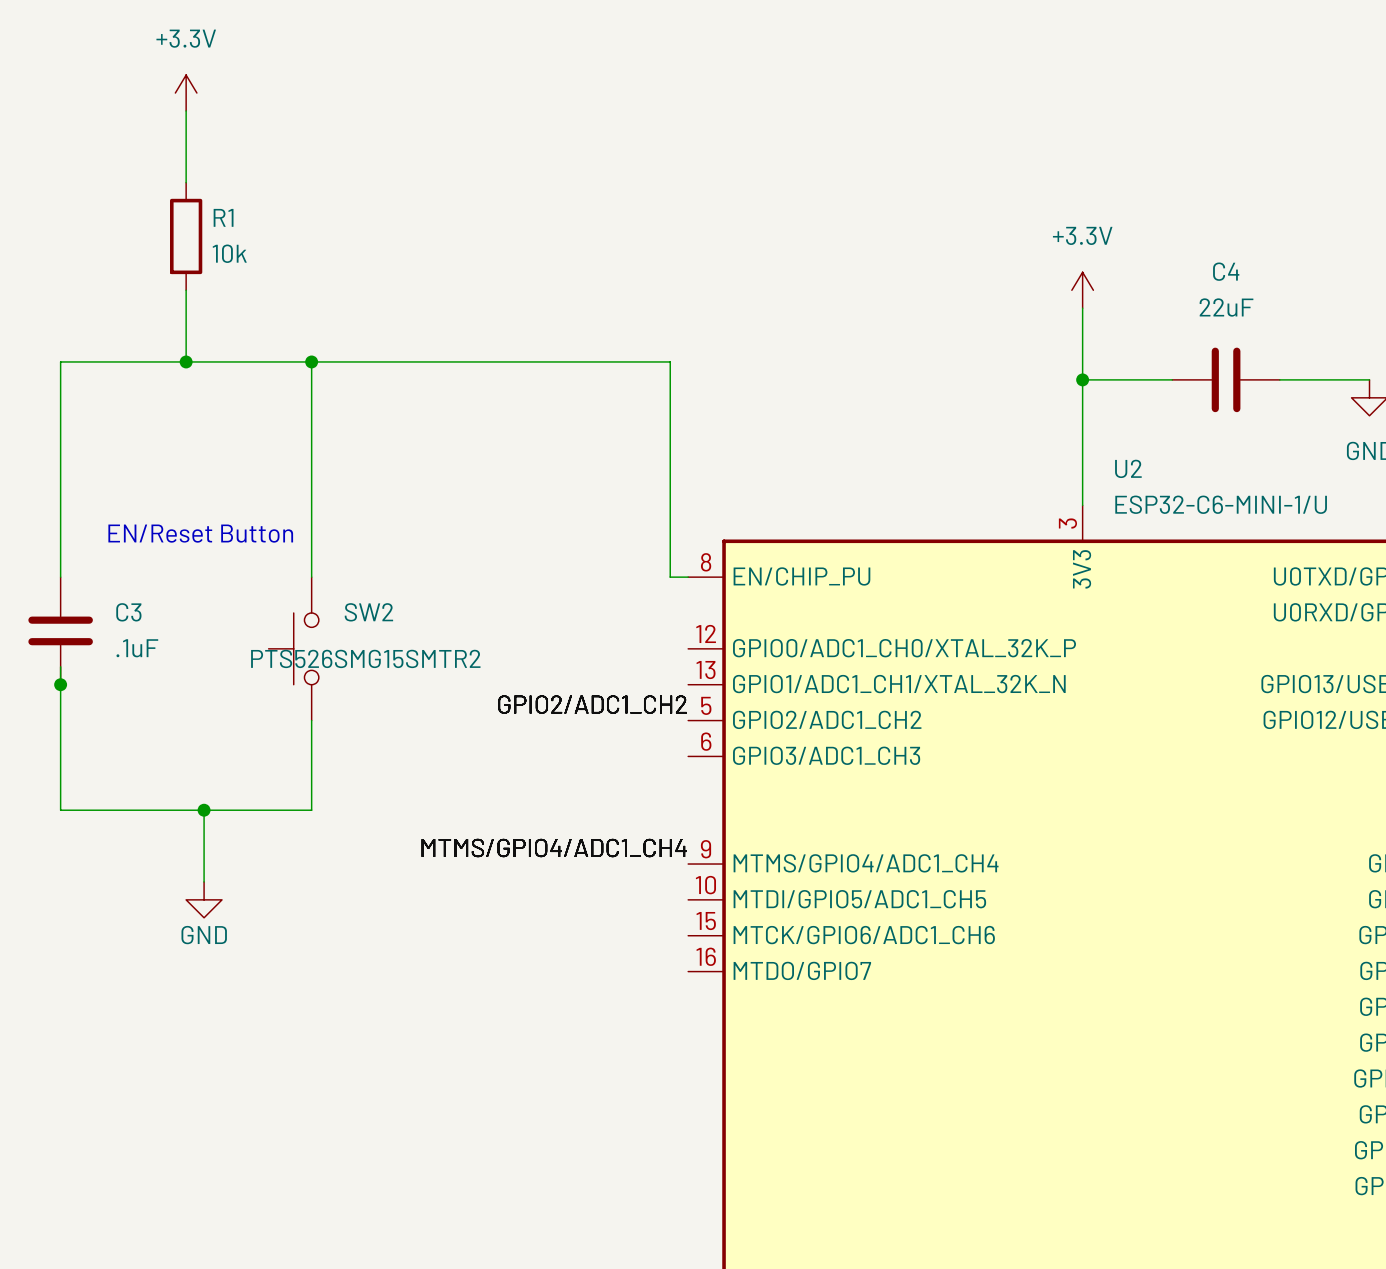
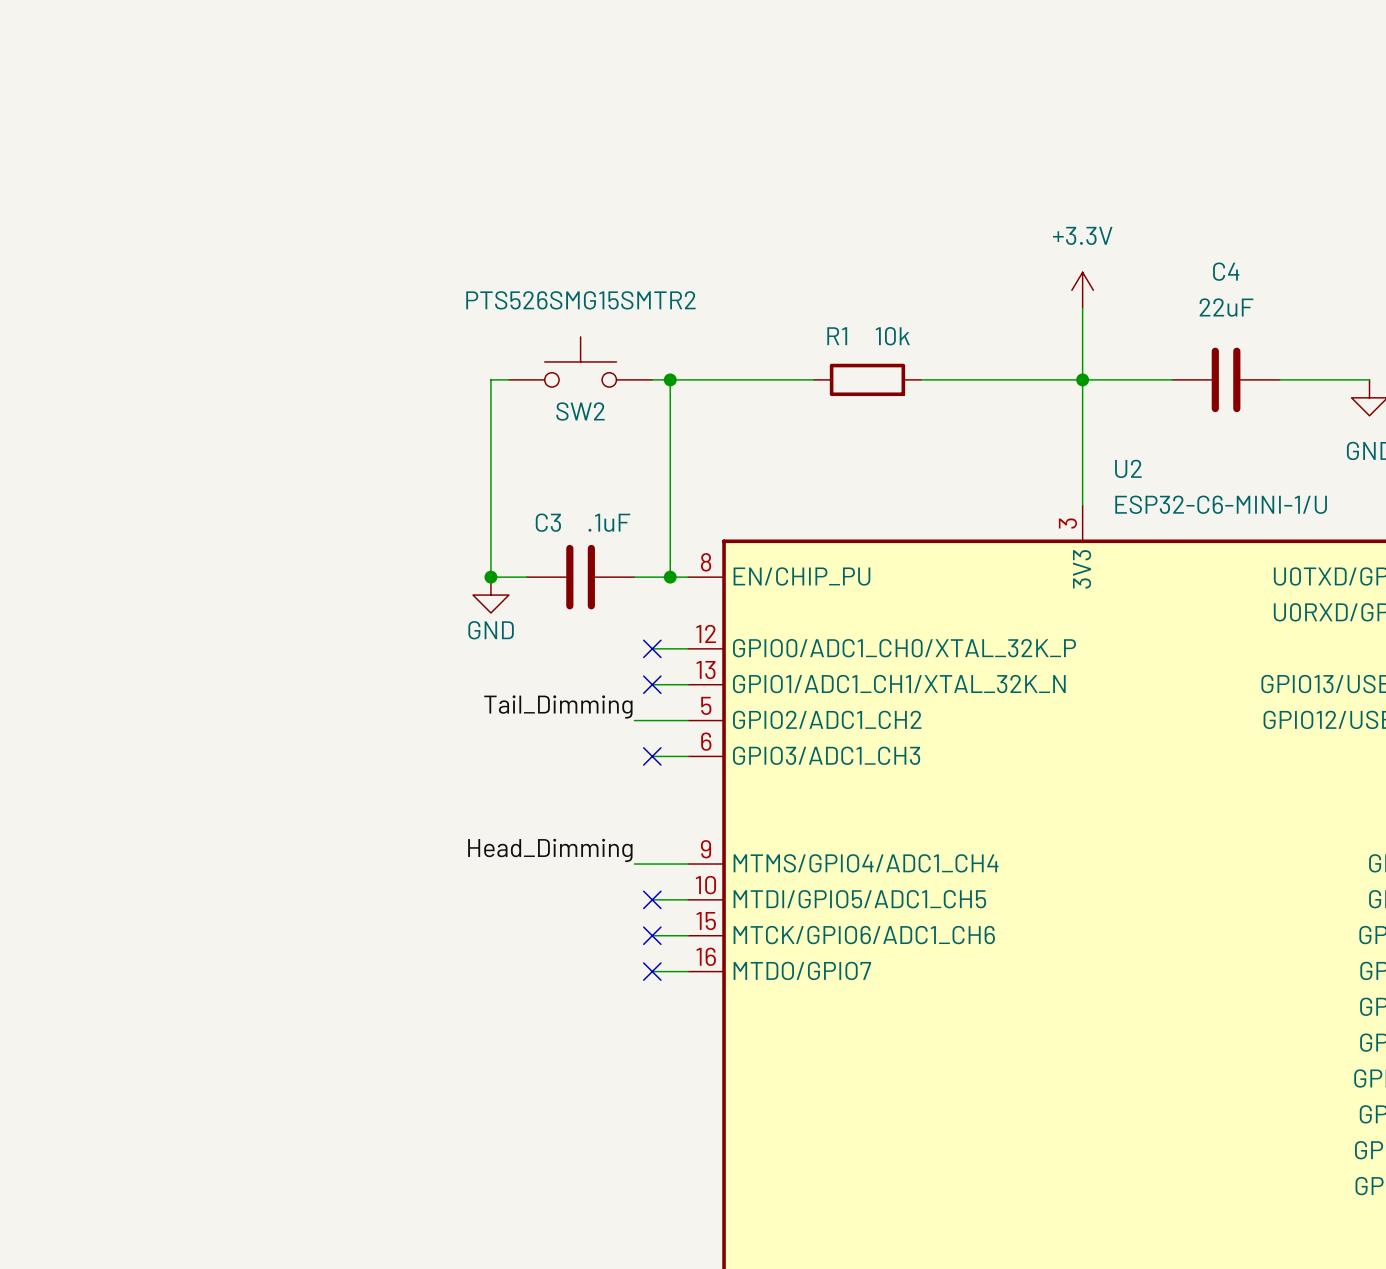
power symbol: +3.3V (186, 93) -> none
wire: (186, 110) (186, 182) -> none
R1 name position: R1 (223, 217) -> R1 (837, 336)
R1 rotation: 0° (186, 236) -> 90° clockwise (867, 379)
R1 position: (186, 236) -> (867, 379)
R1 value position: 10k (229, 253) -> 10k (892, 336)
wire: (186, 290) (186, 361) -> none
junction: (186, 361) -> none
wire: (311, 361) (311, 577) -> none
junction: (311, 361) -> none
wire: none -> (508, 379) (490, 379) (490, 577) (526, 577)
wire: none -> (652, 379) (813, 379)
wire: (670, 379) (670, 361) (60, 361) (60, 577) -> none
junction: none -> (670, 379)
wire: none -> (921, 379) (1082, 379)
text: EN/Reset Button (200, 533) -> none
junction: none -> (490, 577)
wire: none -> (634, 577) (670, 577)
junction: none -> (670, 577)
power symbol: none -> GND (490, 595)
C3 name position: C3 (128, 612) -> C3 (548, 522)
SW2 name position: SW2 (368, 612) -> SW2 (580, 411)
C3 rotation: 0° (60, 630) -> 90° clockwise (580, 577)
C3 position: (60, 630) -> (580, 577)
C3 value position: .1uF (137, 648) -> .1uF (609, 522)
SW2 rotation: 0° (293, 648) -> 90° clockwise (580, 361)
SW2 position: (293, 648) -> (580, 361)
wire: none -> (652, 648) (688, 648)
no-connect mark: none -> (652, 648)
SW2 value position: PTS526SMG15SMTR2 (365, 658) -> PTS526SMG15SMTR2 (580, 300)
wire: (60, 666) (60, 810) (311, 810) (311, 720) -> none
junction: (60, 684) -> none
wire: none -> (652, 684) (688, 684)
no-connect mark: none -> (652, 684)
label: GPIO2/ADC1_CH2 (592, 704) -> none
label: none -> Tail_Dimming (558, 706)
wire: none -> (634, 720) (688, 720)
wire: none -> (652, 756) (688, 756)
no-connect mark: none -> (652, 756)
wire: (204, 810) (204, 881) -> none
junction: (204, 810) -> none
label: MTMS/GPIO4/ADC1_CH4 (554, 848) -> none
label: none -> Head_Dimming (550, 850)
wire: none -> (634, 864) (688, 864)
power symbol: GND (204, 899) -> none
wire: none -> (652, 899) (688, 899)
no-connect mark: none -> (652, 899)
wire: none -> (652, 935) (688, 935)
no-connect mark: none -> (652, 935)
wire: none -> (652, 971) (688, 971)
no-connect mark: none -> (652, 971)

